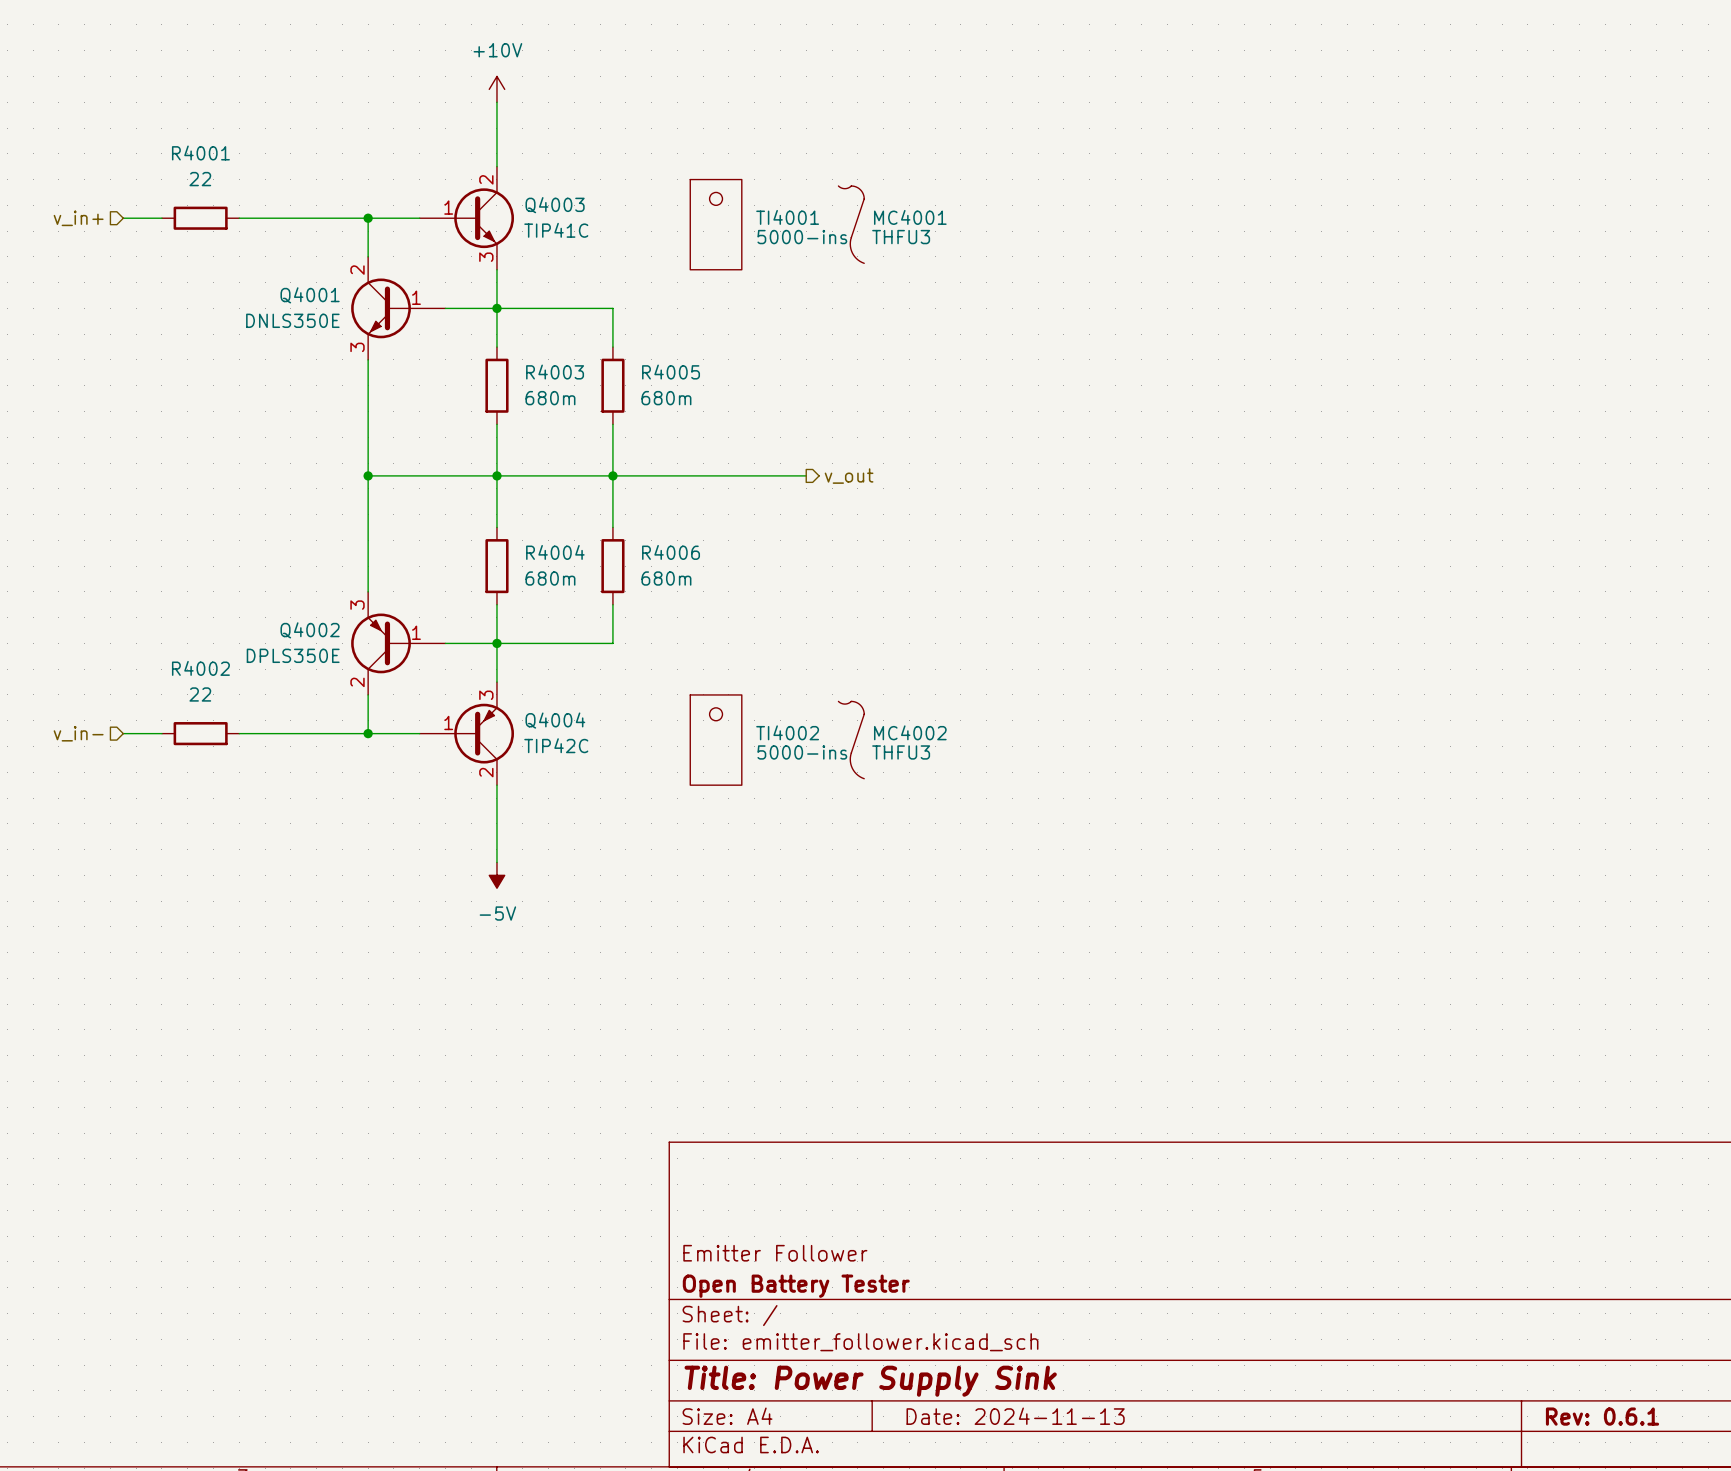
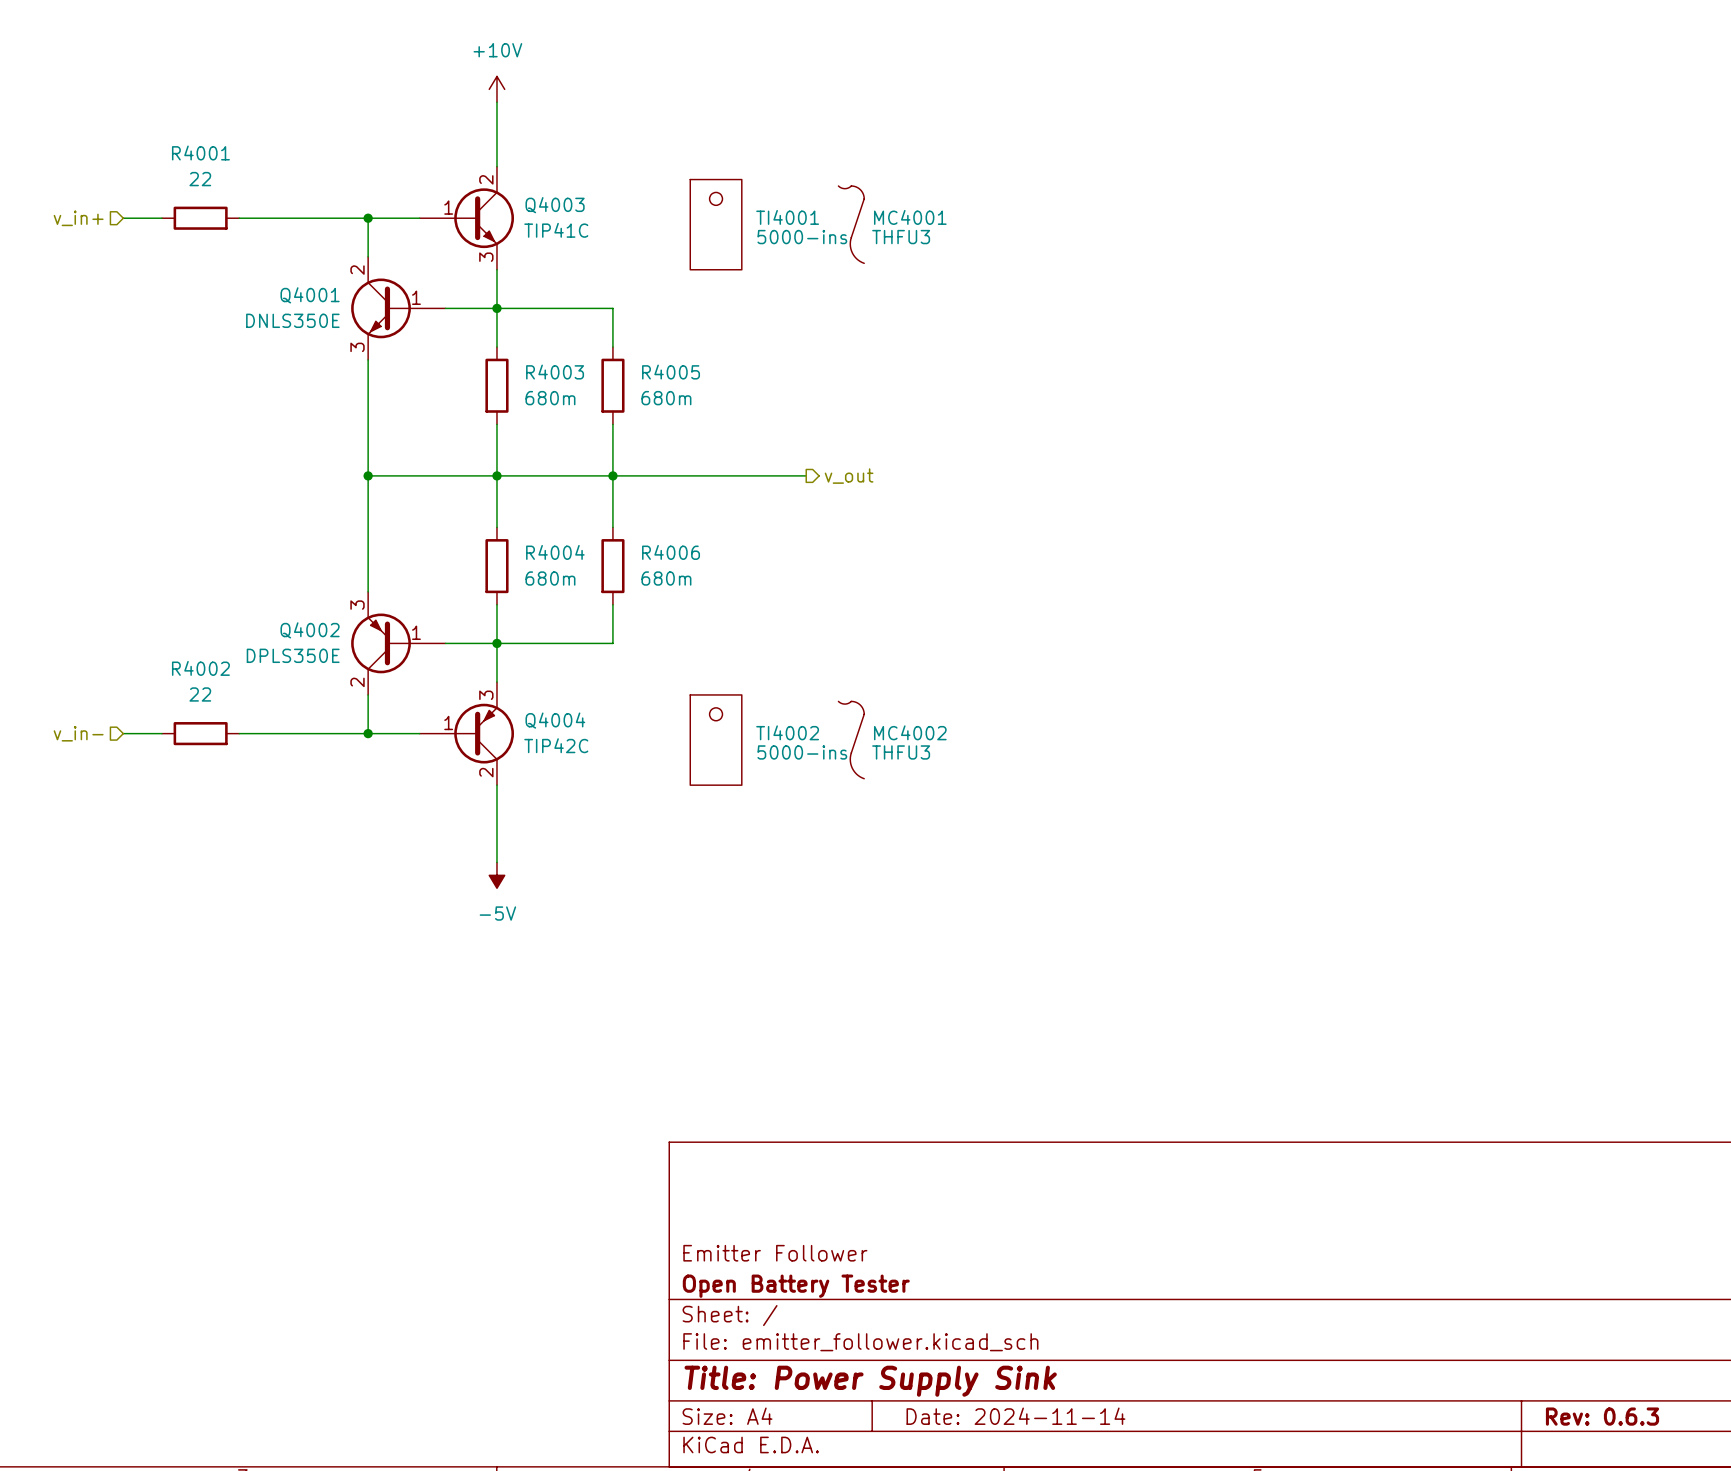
title block: Date: 2024-11-13 (1015, 1416) -> Date: 2024-11-14 (1015, 1416)
title block: Rev: 0.6.1 (1602, 1416) -> Rev: 0.6.3 (1602, 1416)

